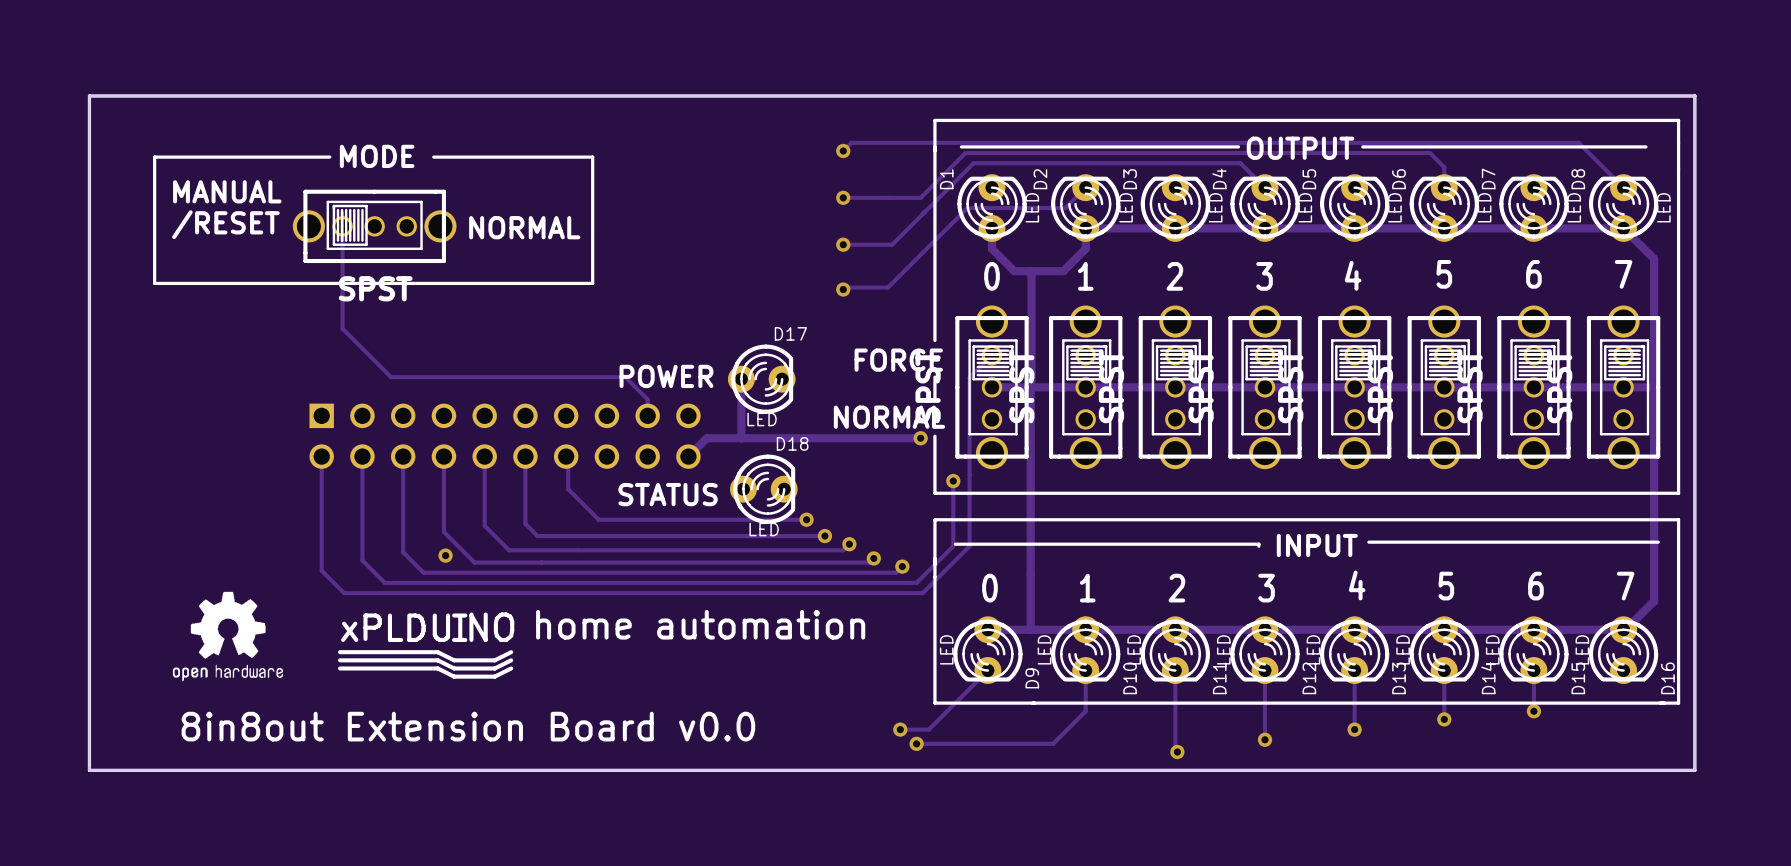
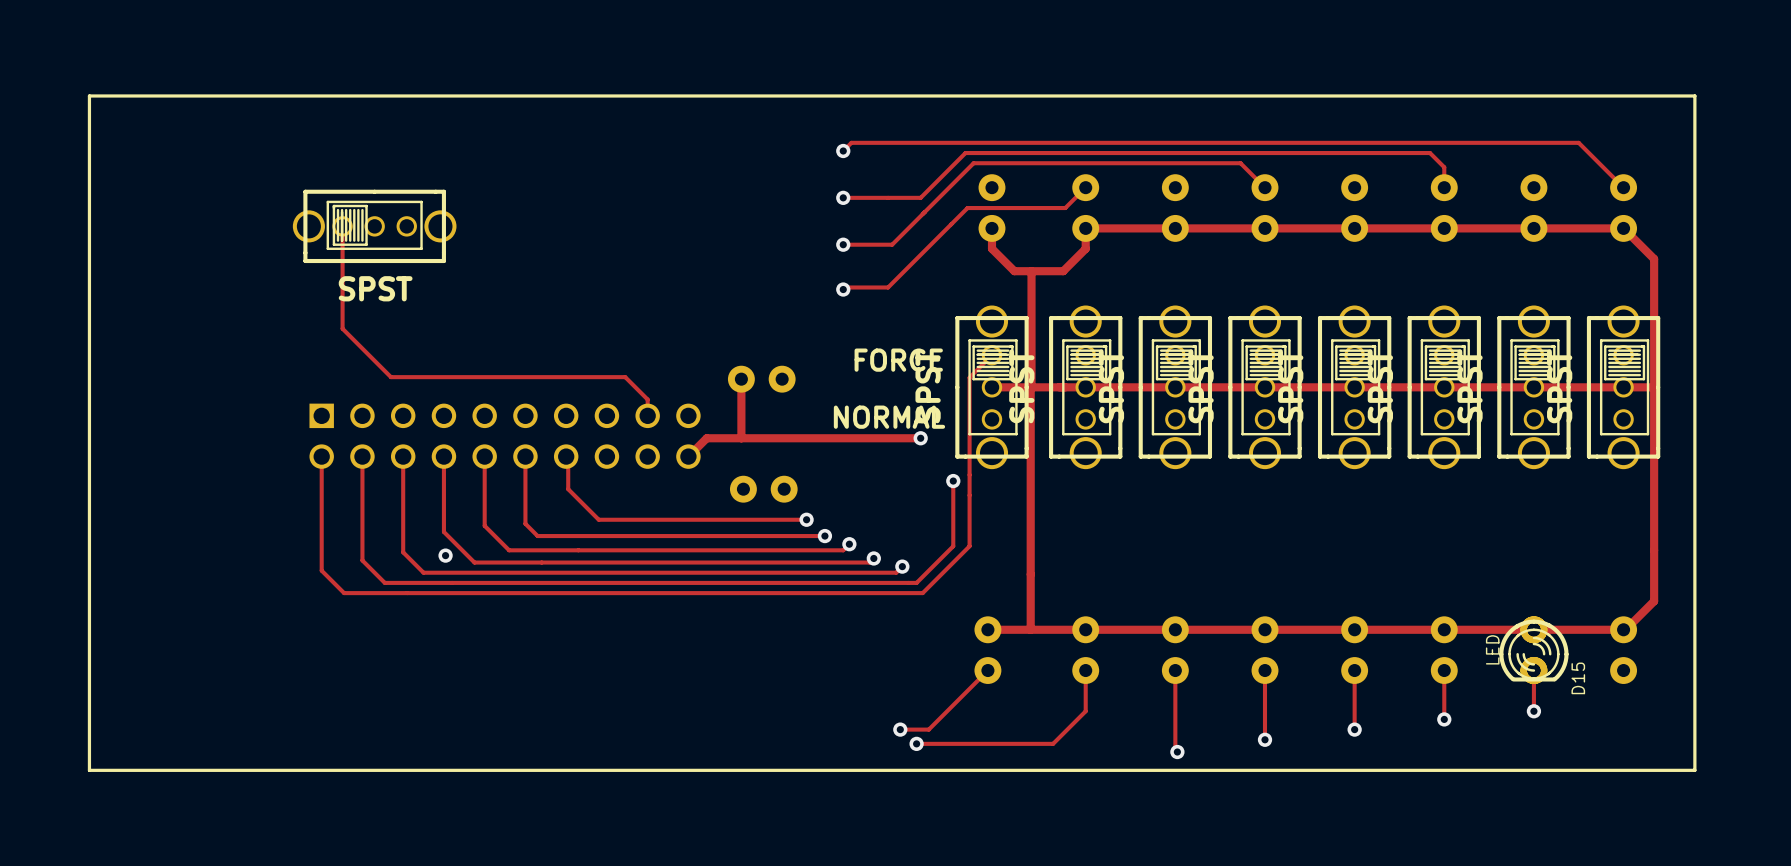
board edge: (89, 95) (89, 770) (1694, 770) (1694, 95) (89, 95) -> none
line: (961, 146) (1238, 146) -> none
line: (1362, 146) (1645, 146) -> none
text: OUTPUT (1300, 148) -> none
text: MODE (377, 156) -> none
line: (329, 157) (154, 157) (154, 283) (592, 283) (592, 157) (433, 157) -> none
text: MANUAL (227, 191) -> none
D1: LED (991, 208) -> none
part: none -> (991, 208)
D2: LED (1085, 208) -> none
part: none -> (1085, 208)
D3: LED (1175, 208) -> none
part: none -> (1175, 208)
D4: LED (1265, 208) -> none
part: none -> (1265, 208)
D5: LED (1354, 208) -> none
part: none -> (1354, 208)
D6: LED (1444, 208) -> none
part: none -> (1444, 208)
D7: LED (1533, 208) -> none
part: none -> (1533, 208)
D8: LED (1623, 208) -> none
part: none -> (1623, 208)
text: /RESET (225, 224) -> none
text: NORMAL (524, 227) -> none
text: 5 (1444, 274) -> none
text: 6 (1533, 274) -> none
text: 7 (1623, 274) -> none
text: 4 (1353, 275) -> none
text: 0 (991, 276) -> none
text: 1 (1085, 276) -> none
text: 2 (1174, 276) -> none
text: 3 (1264, 276) -> none
line: (934, 340) (934, 120) (1678, 120) (1678, 493) (934, 493) (934, 436) -> none
text: POWER (666, 376) -> none
line: (934, 377) (934, 399) -> none
D17: LED (761, 379) -> none
part: none -> (761, 379)
D18: LED (763, 489) -> none
part: none -> (763, 489)
text: STATUS (668, 494) -> none
line: (934, 519) (1678, 519) (1678, 703) (934, 703) (934, 519) -> none
line: (1368, 542) (1658, 542) -> none
line: (955, 544) (1258, 544) (1258, 546) -> none
text: INPUT (1317, 545) -> none
text: 4 (1357, 585) -> none
text: 5 (1446, 586) -> none
text: 6 (1535, 586) -> none
text: 7 (1625, 586) -> none
text: 0 (989, 588) -> none
text: 1 (1087, 588) -> none
text: 2 (1176, 588) -> none
text: 3 (1266, 588) -> none
drawing: [172, 591, 284, 682] -> none
drawing: [338, 612, 515, 679] -> none
text: home automation (700, 624) -> none
D9: LED (987, 650) -> none
part: none -> (987, 650)
D10: LED (1085, 650) -> none
part: none -> (1085, 650)
D11: LED (1175, 650) -> none
part: none -> (1175, 650)
D12: LED (1265, 650) -> none
part: none -> (1265, 650)
D13: LED (1354, 650) -> none
part: none -> (1354, 650)
D14: LED (1444, 650) -> none
part: none -> (1444, 650)
part: none -> (1533, 650)
D16: LED (1623, 650) -> none
part: none -> (1623, 650)
text: 8in8out Extension Board v0.0 (468, 726) -> none

